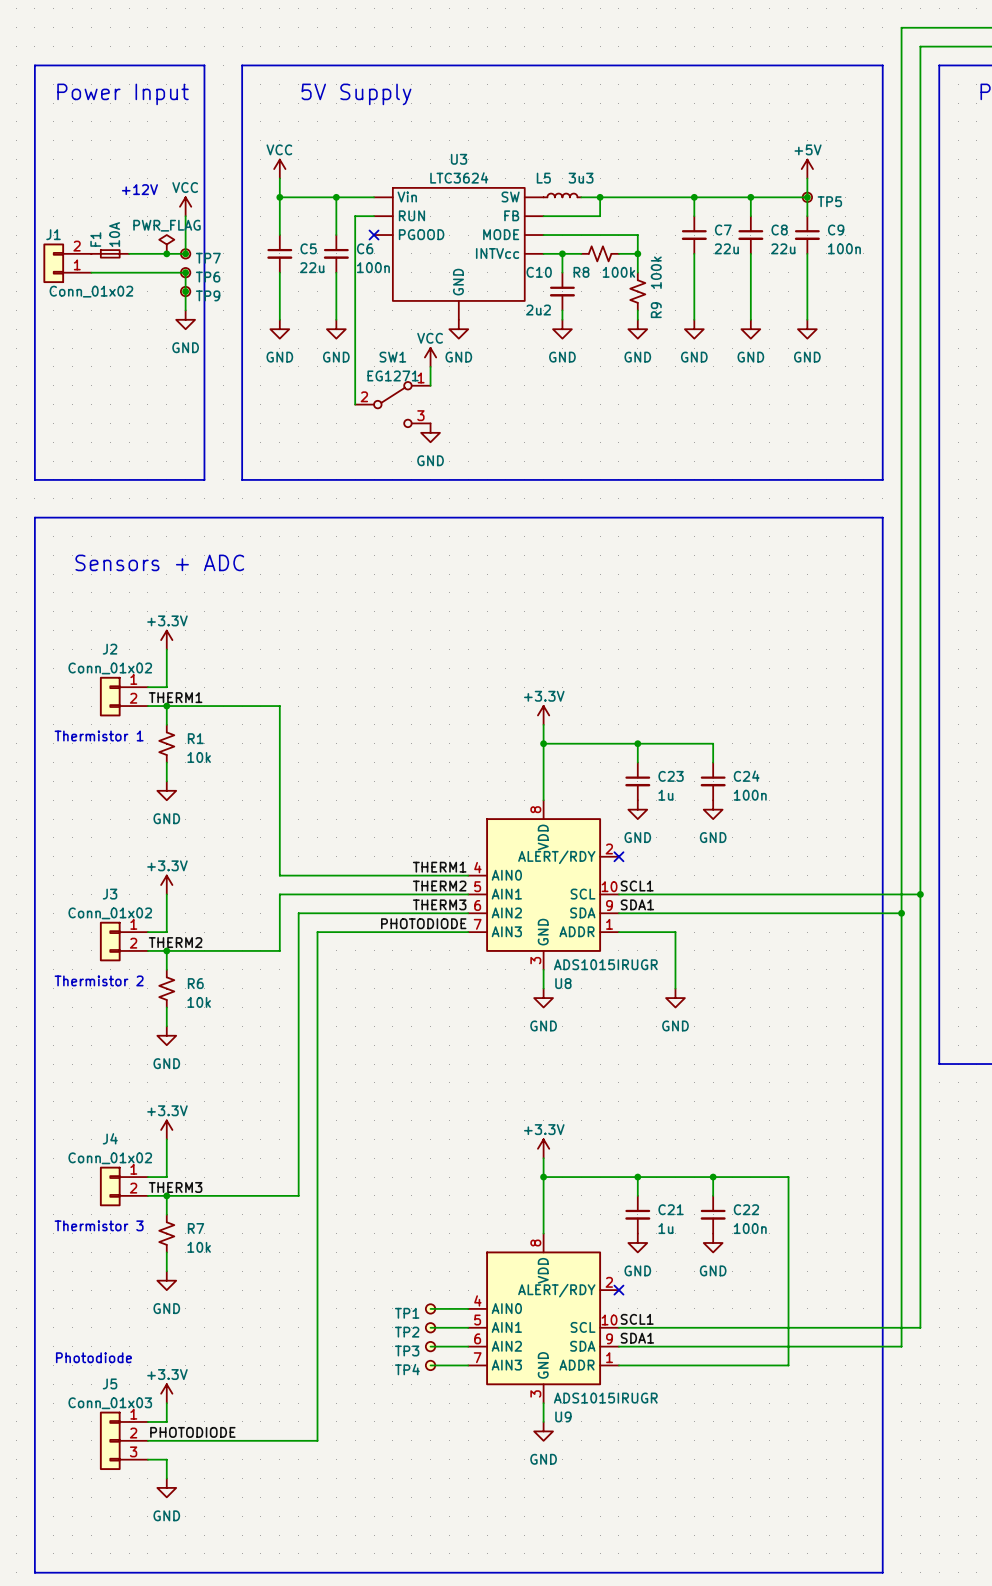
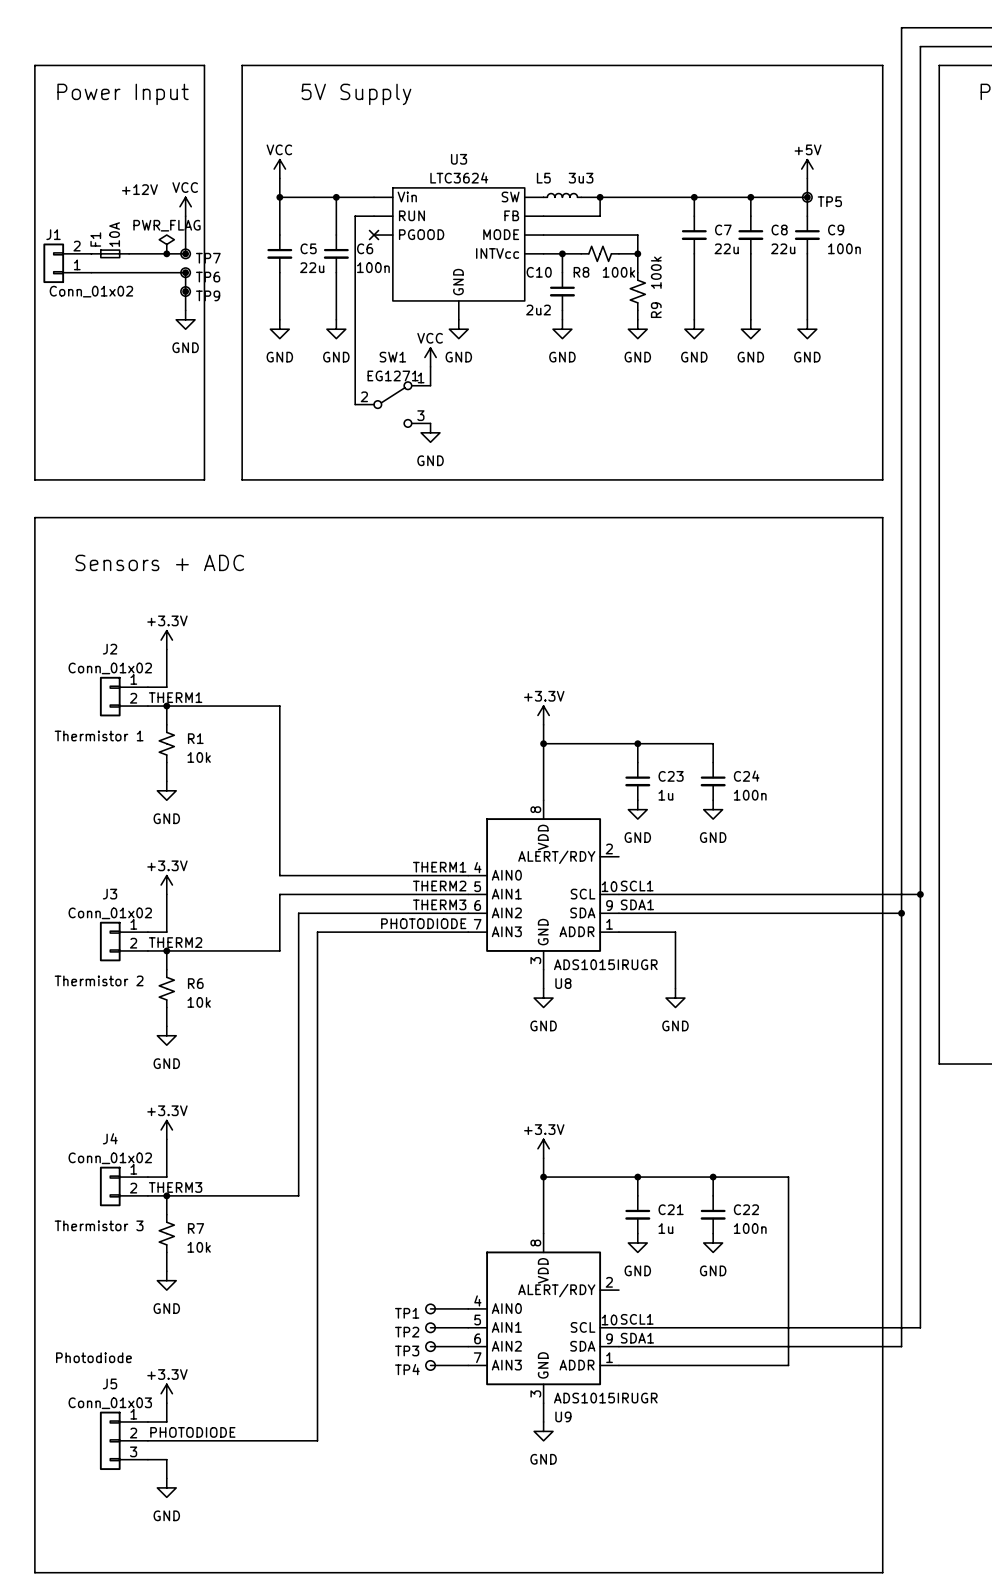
no-connect mark: (618, 856) -> none
no-connect mark: (618, 1290) -> none

